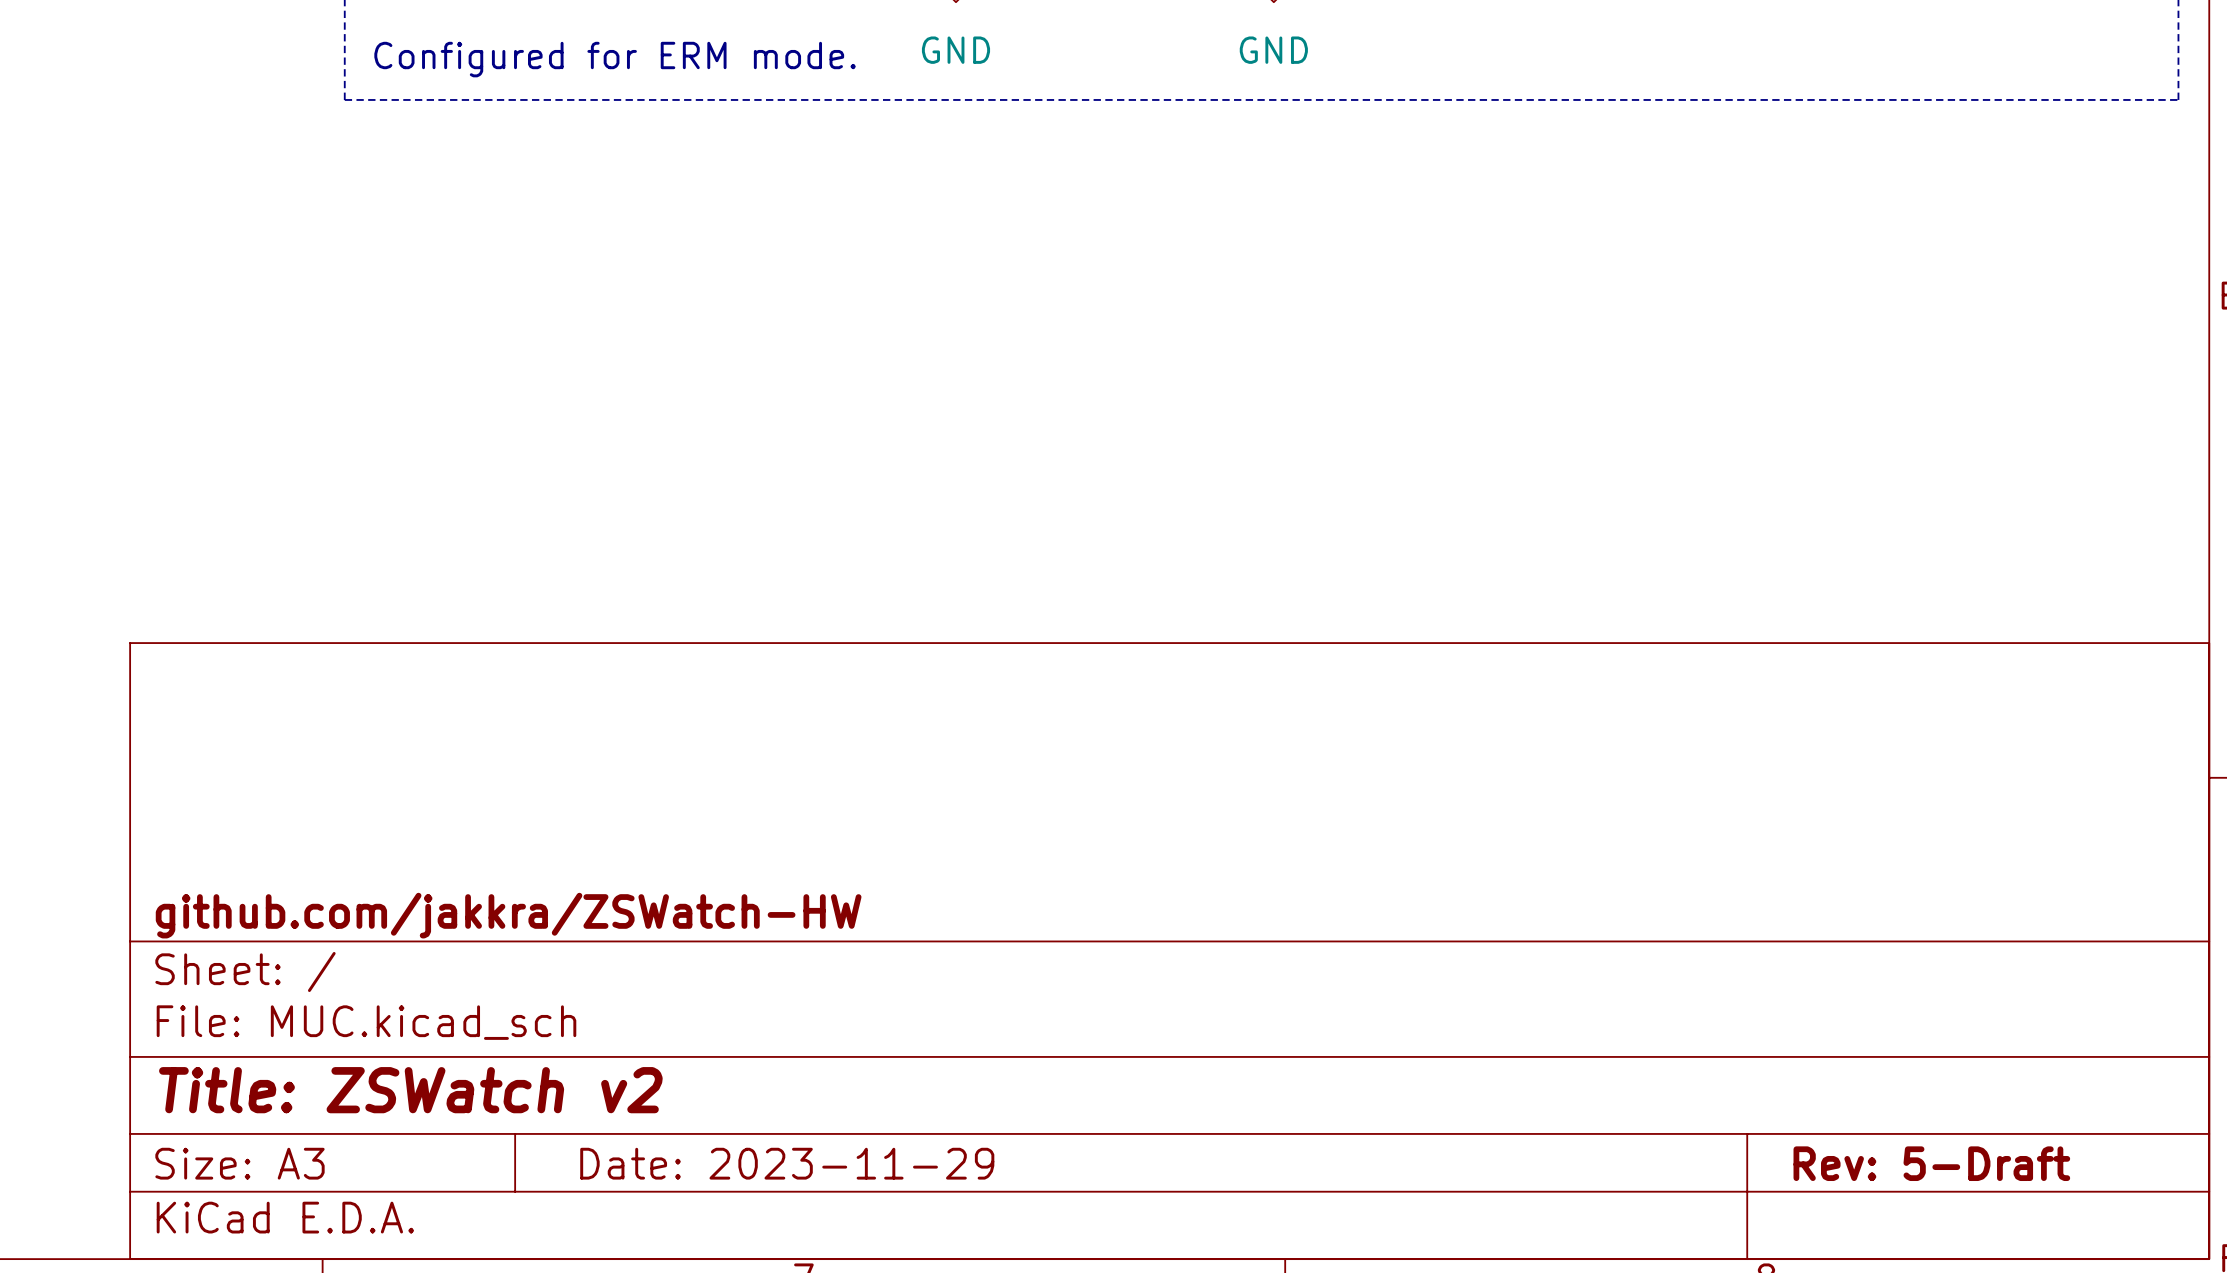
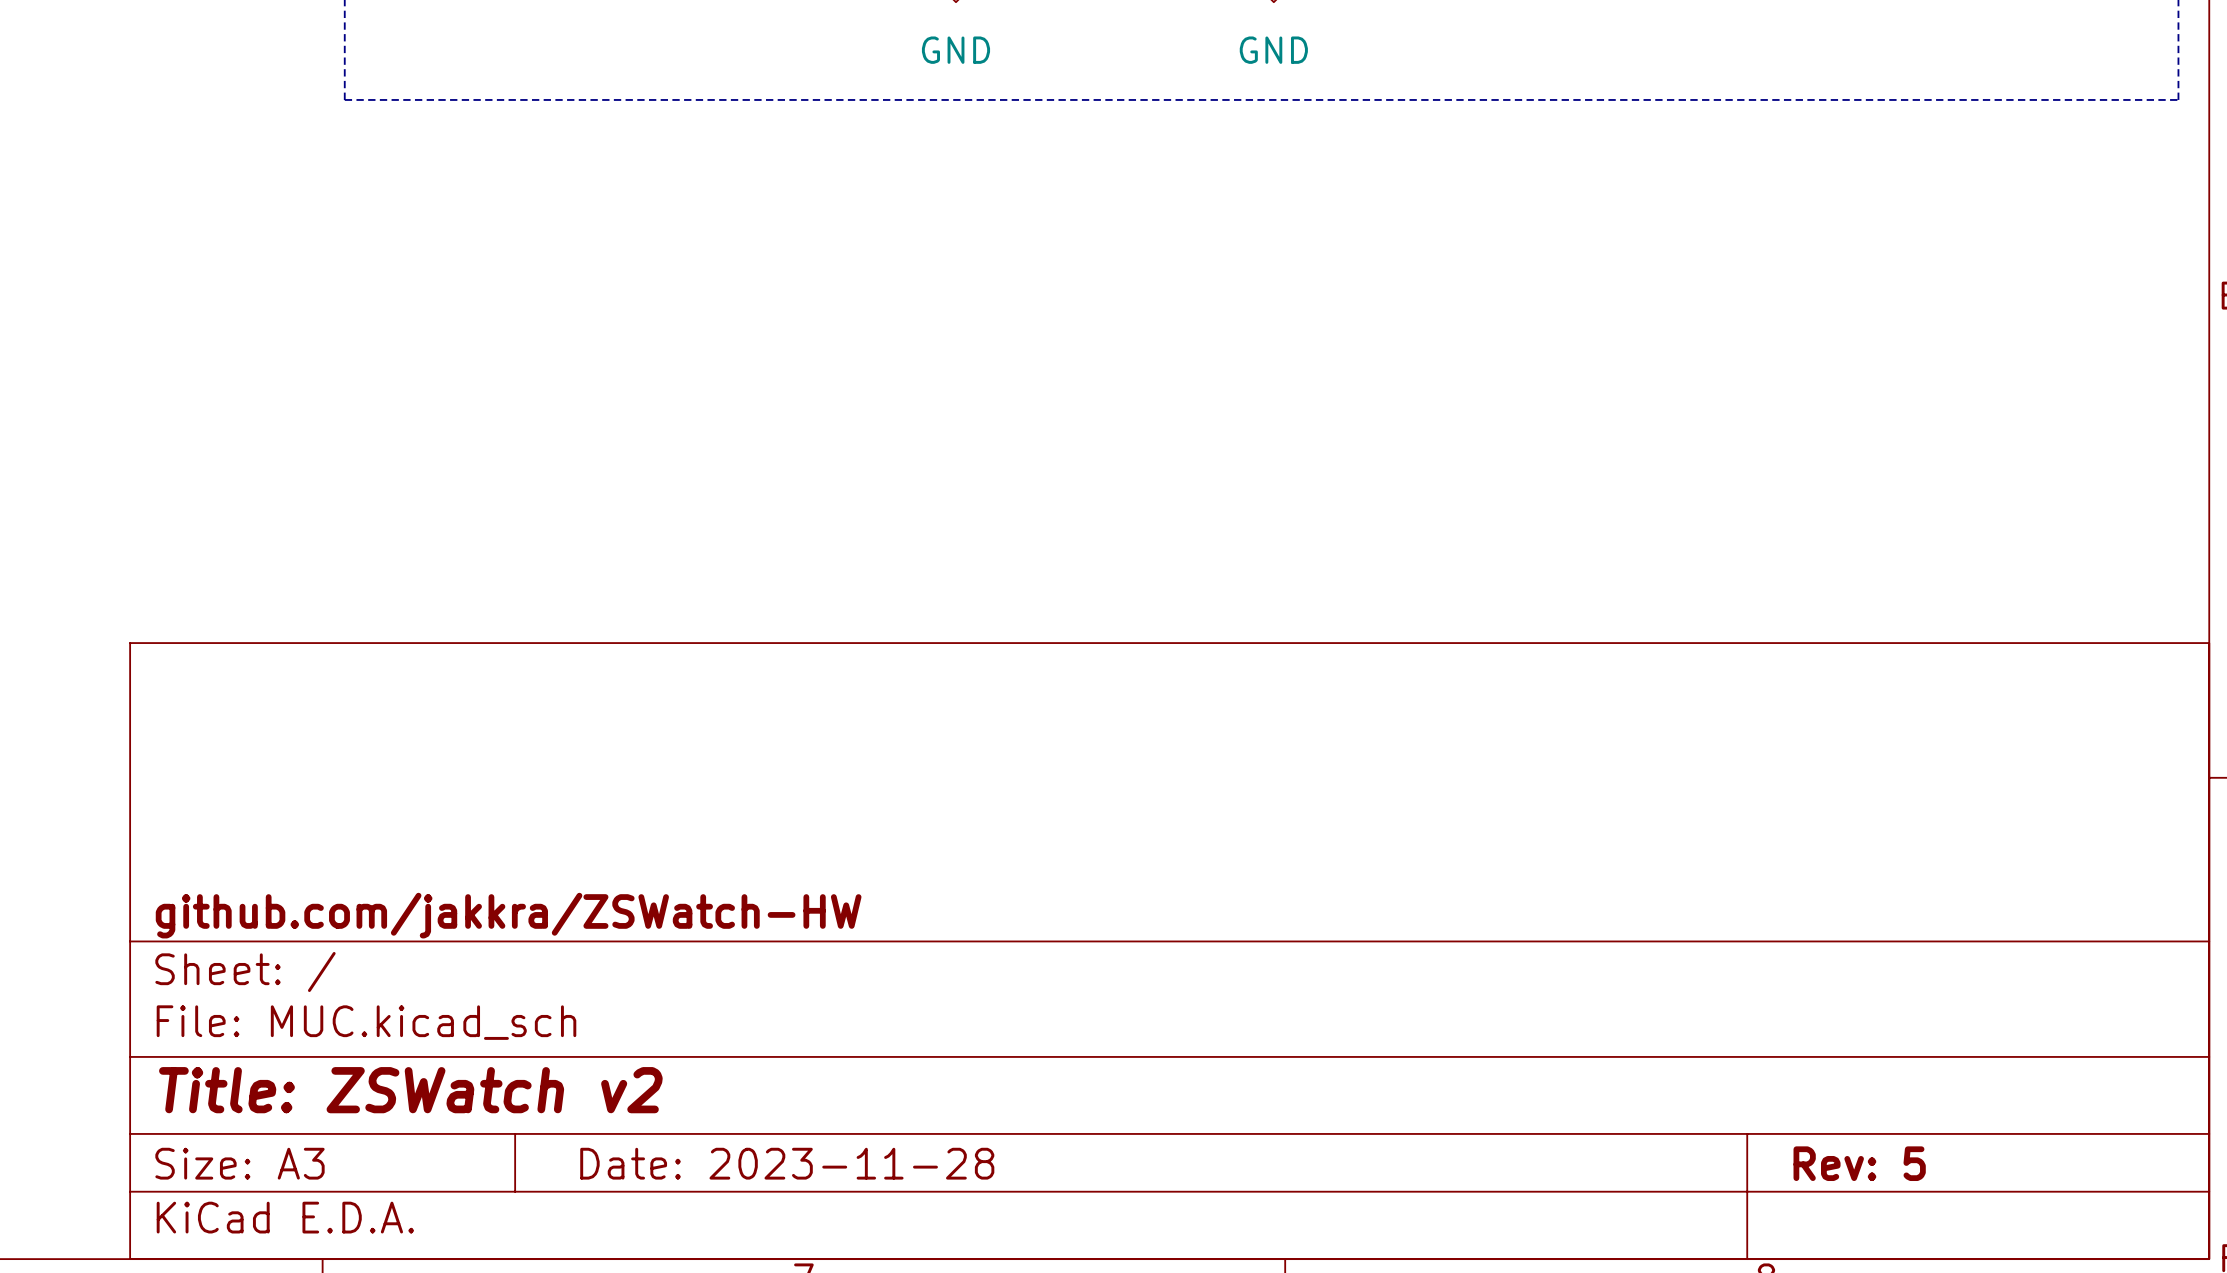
text: Configured for ERM mode. (615, 59) -> none
title block: Date: 2023-11-29 (787, 1163) -> Date: 2023-11-28 (787, 1163)
title block: Rev: 5-Draft (1931, 1163) -> Rev: 5 (1859, 1163)

